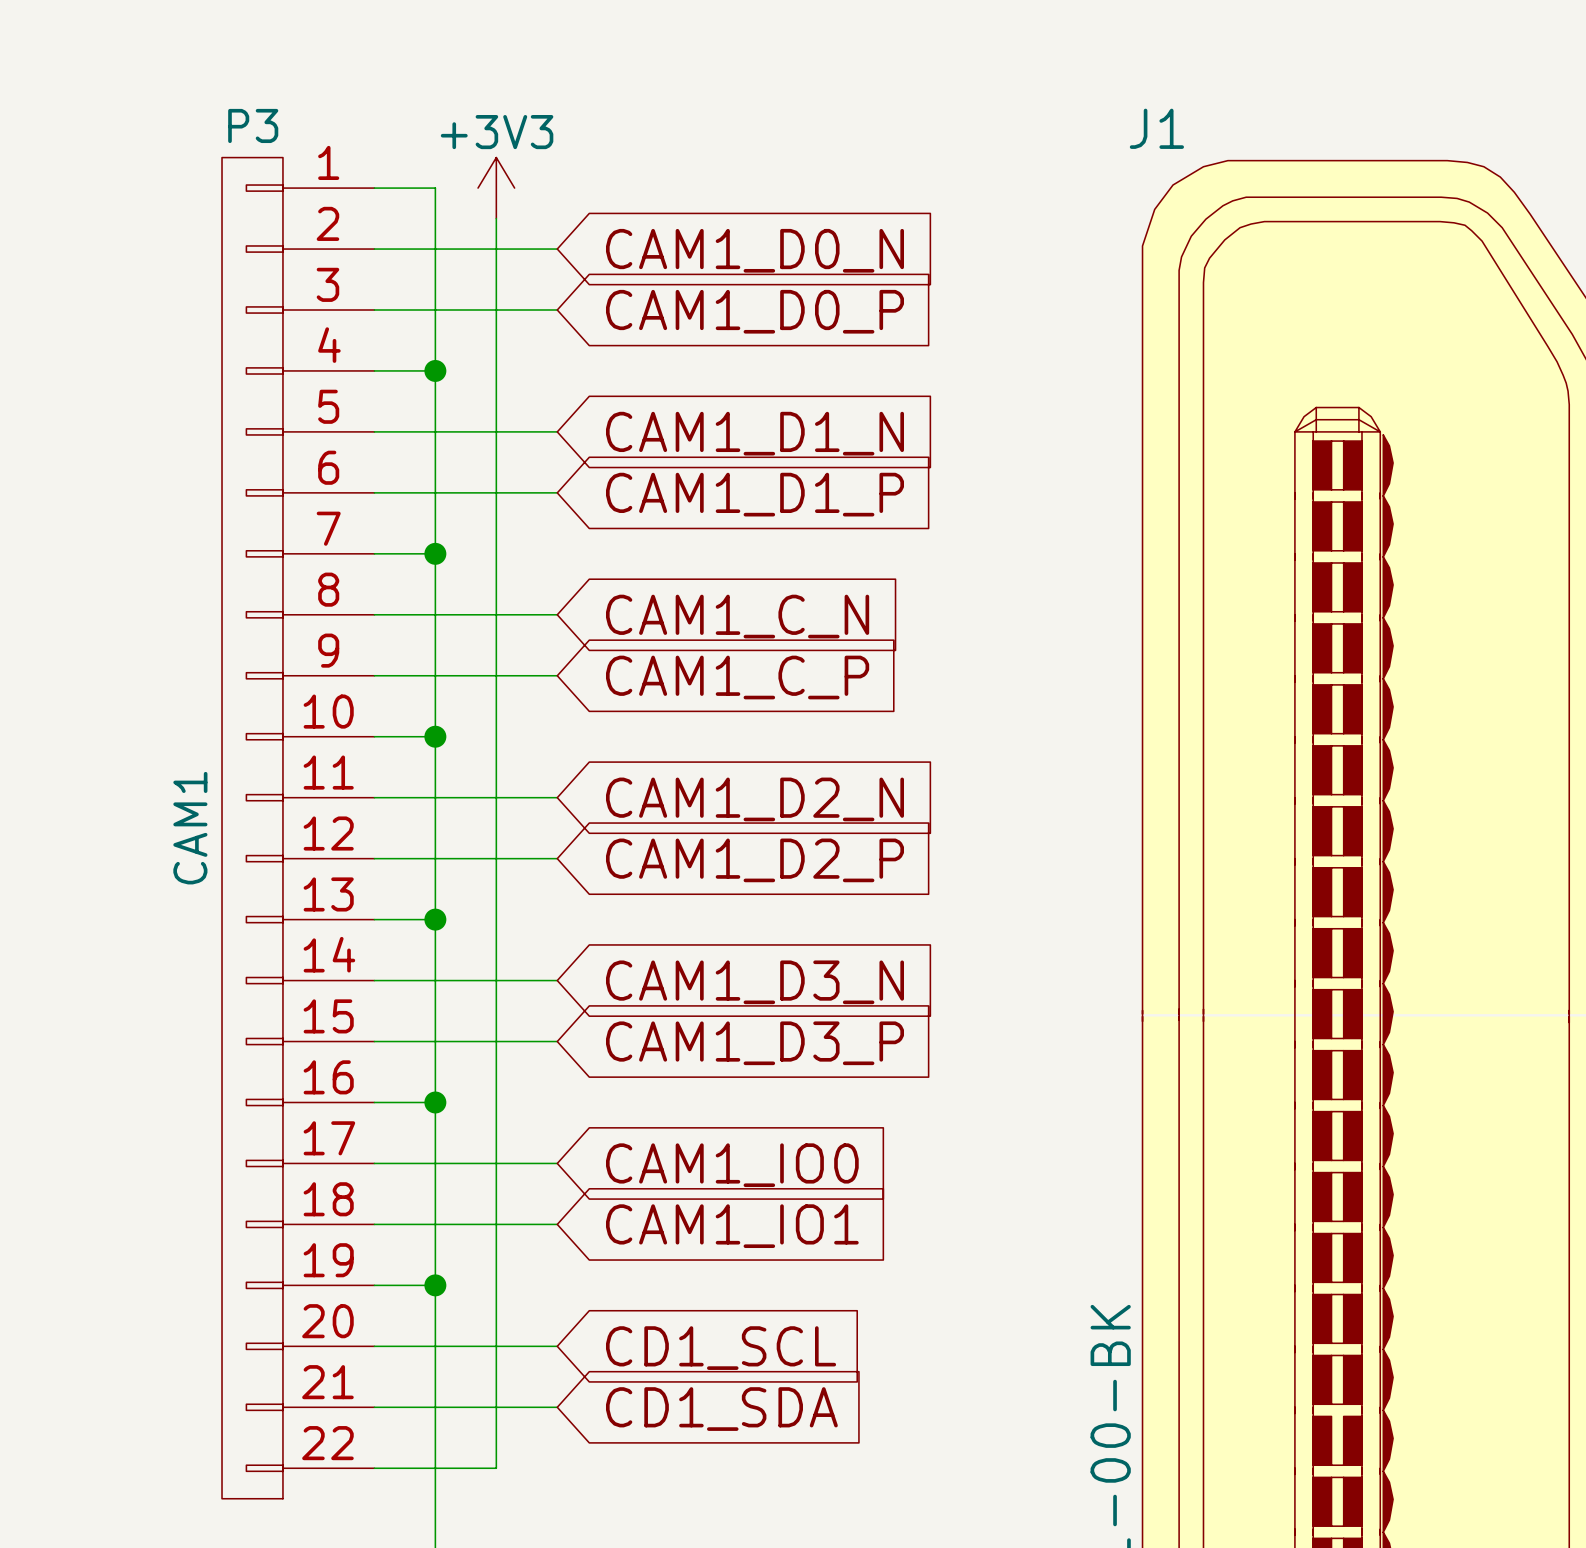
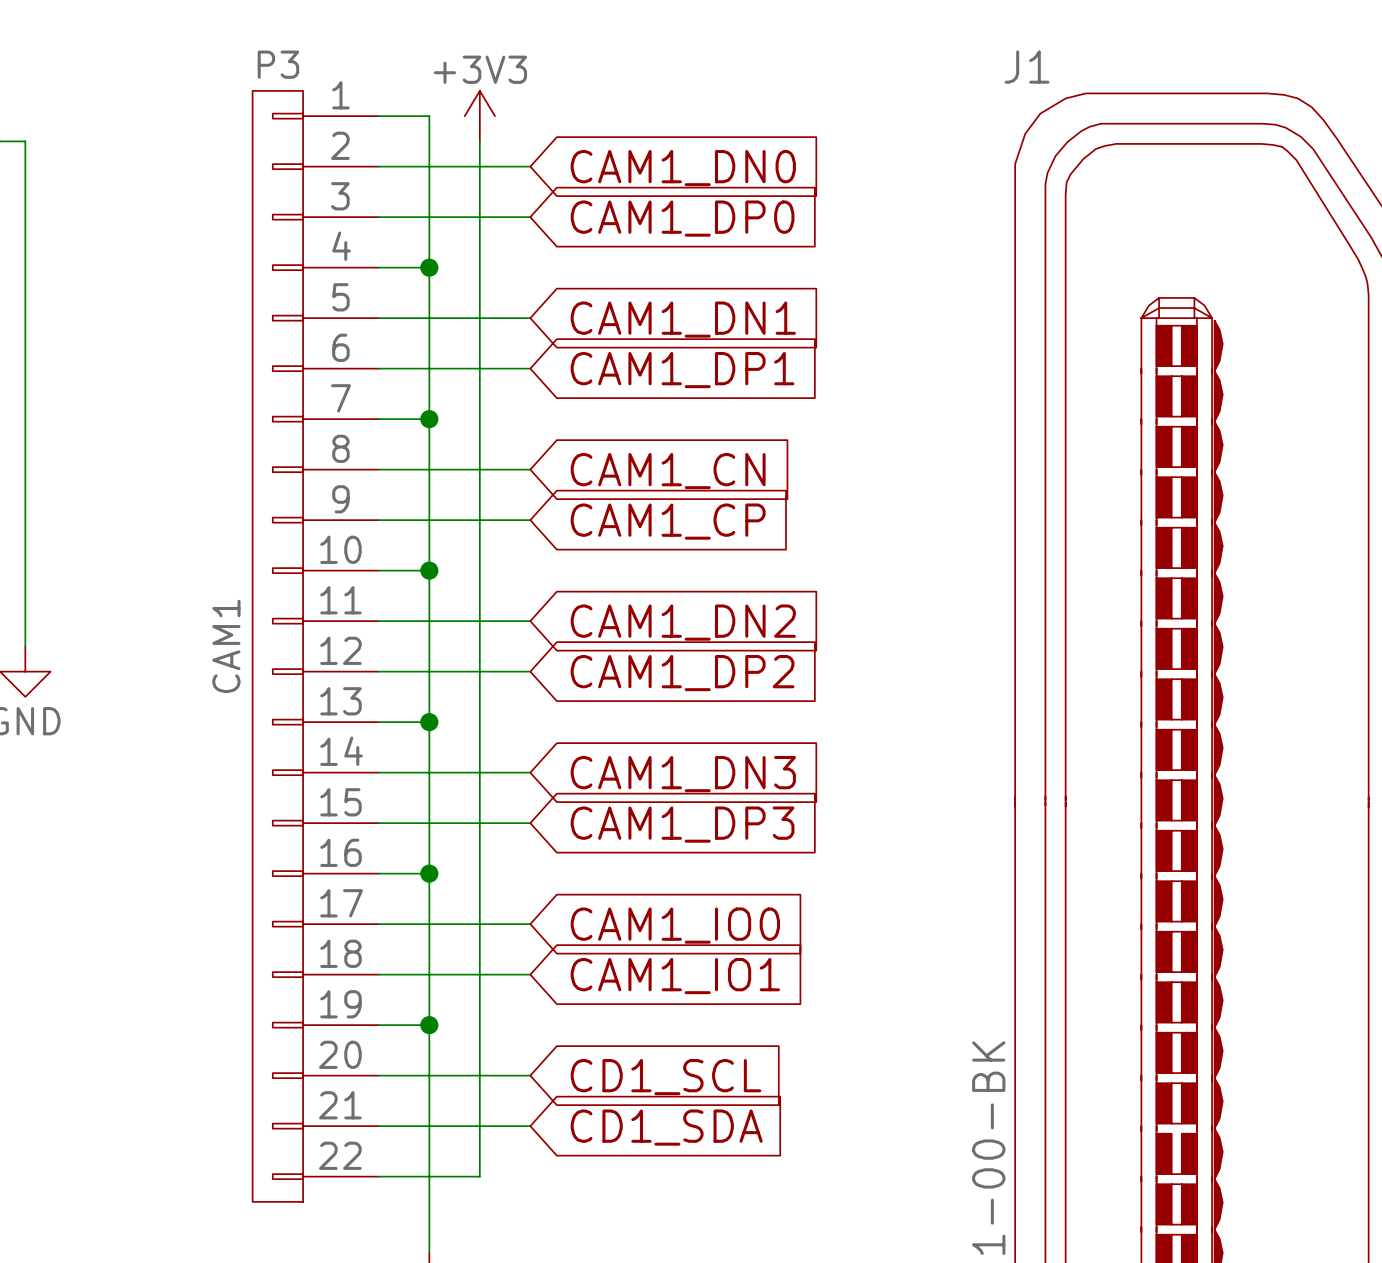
global label: CAM1_D0_N (754, 250) -> CAM1_DN0 (683, 168)
global label: CAM1_D0_P (754, 311) -> CAM1_DP0 (682, 218)
global label: CAM1_D1_N (754, 433) -> CAM1_DN1 (683, 319)
global label: CAM1_D1_P (754, 494) -> CAM1_DP1 (682, 370)
global label: CAM1_C_N (737, 616) -> CAM1_CN (668, 471)
global label: CAM1_C_P (737, 677) -> CAM1_CP (668, 521)
global label: CAM1_D2_N (754, 799) -> CAM1_DN2 (683, 622)
global label: CAM1_D2_P (754, 860) -> CAM1_DP2 (682, 673)
global label: CAM1_D3_N (754, 982) -> CAM1_DN3 (683, 774)
global label: CAM1_D3_P (754, 1043) -> CAM1_DP3 (682, 824)

